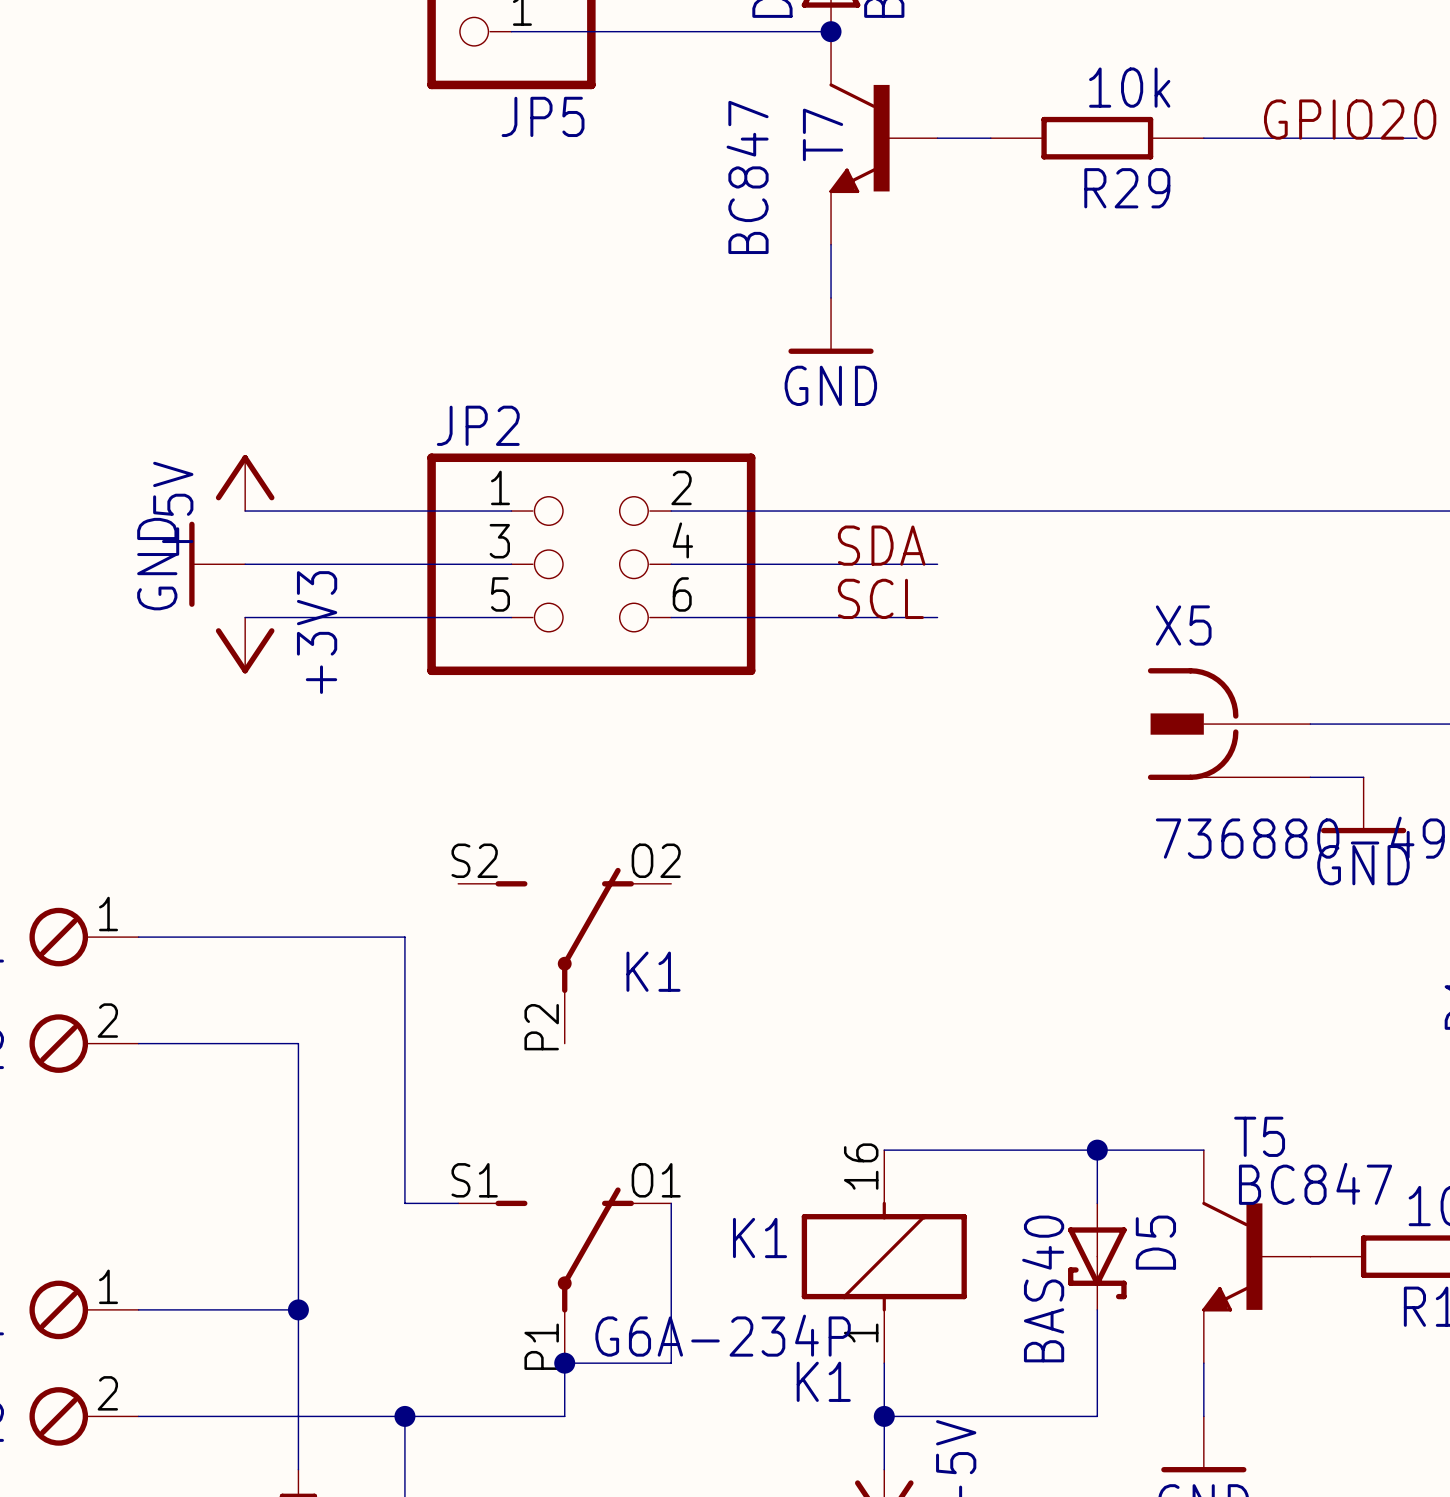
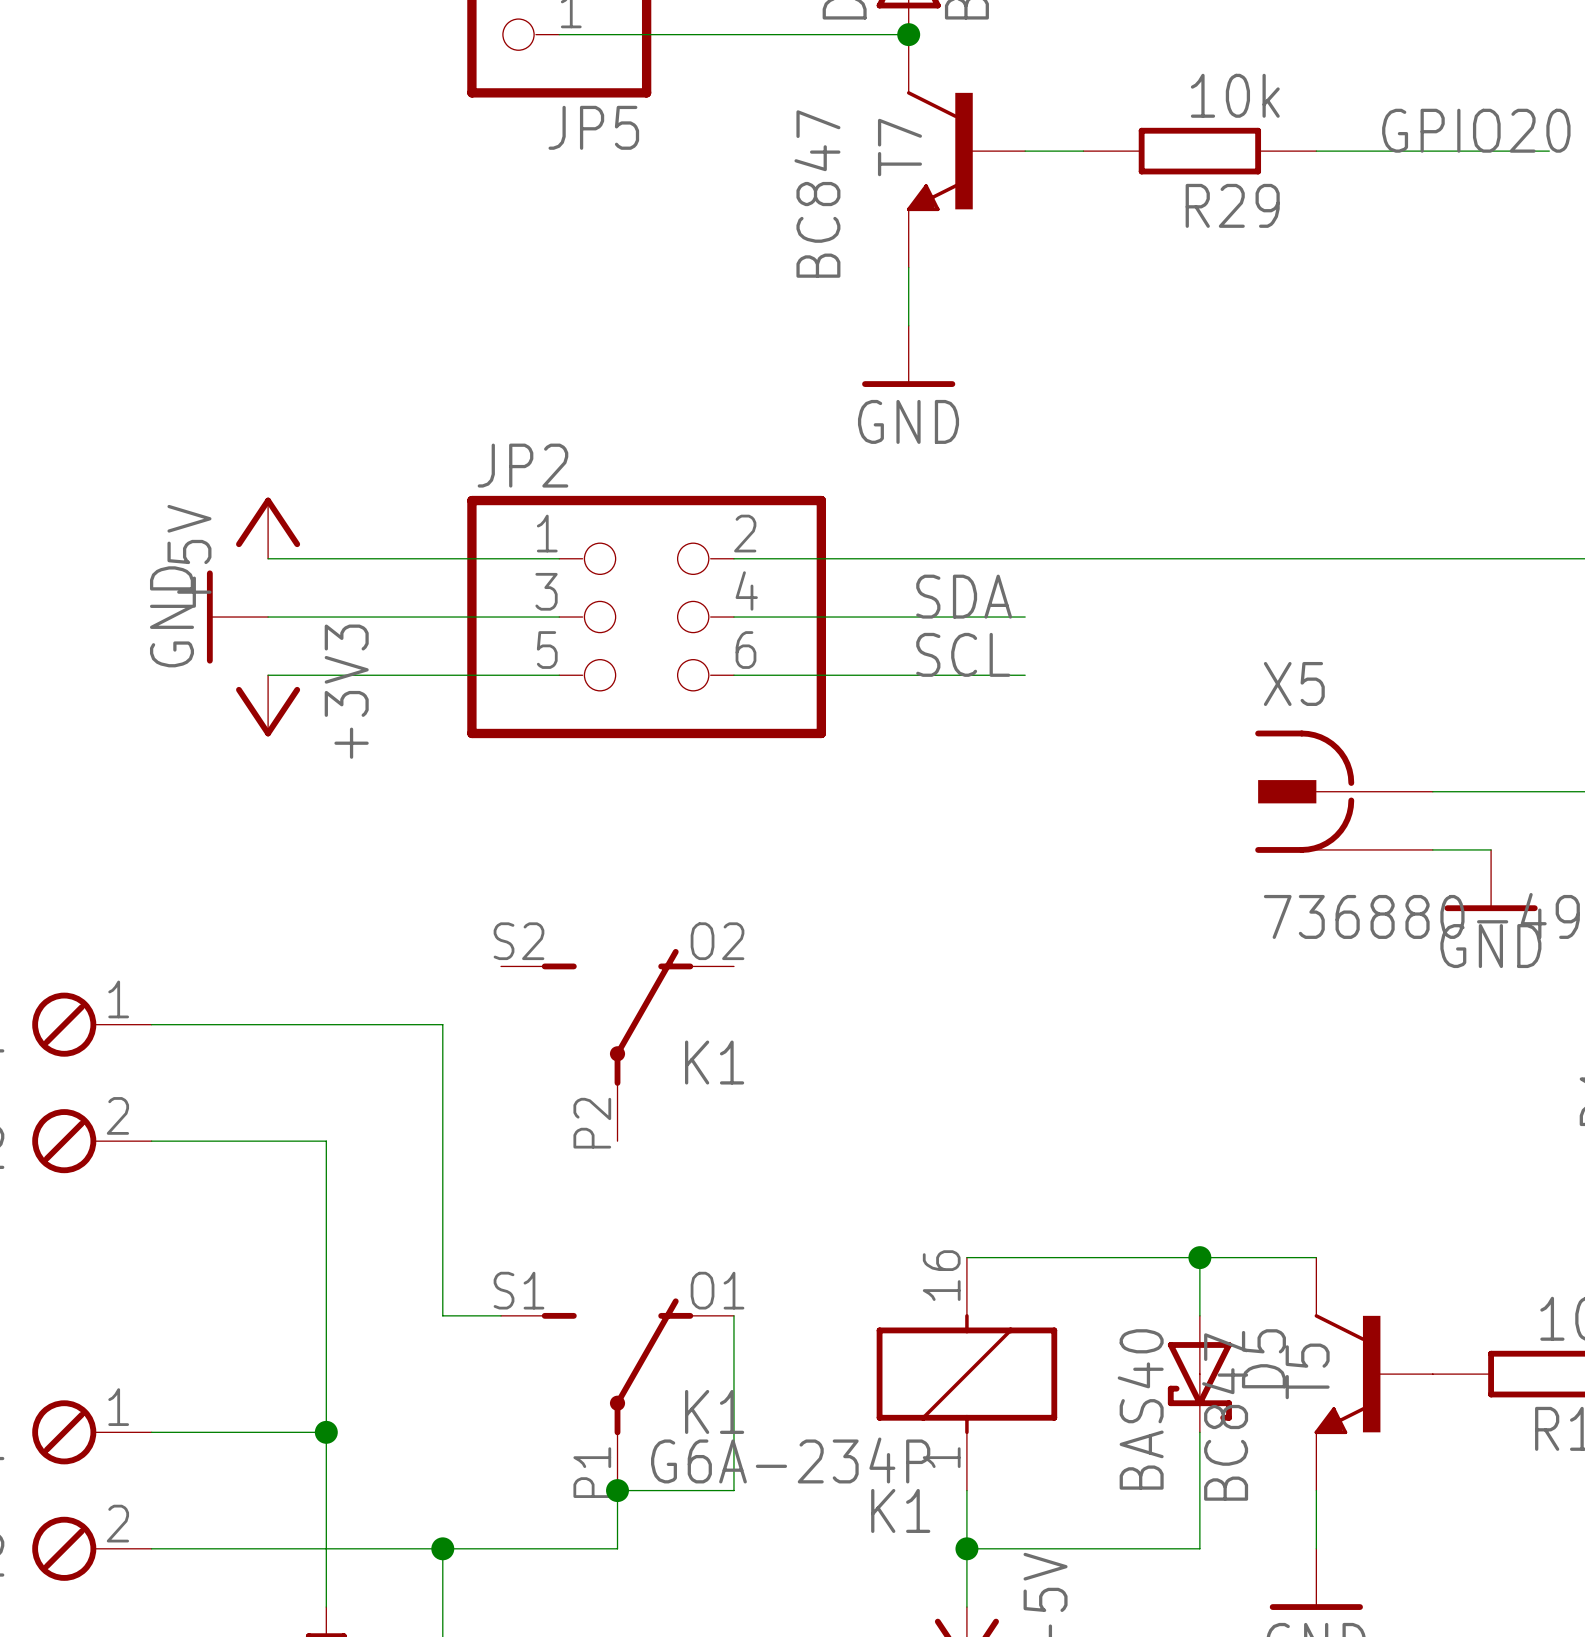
T5 name rotation: 0° (1259, 1136) -> 90° counterclockwise (1307, 1371)
T5 name position: T5 (1259, 1136) -> T5 (1307, 1371)
T5 value rotation: 0° (1315, 1183) -> 90° counterclockwise (1225, 1417)
T5 value position: BC847 (1315, 1183) -> BC847 (1225, 1417)
K1 name position: K1 (760, 1238) -> K1 (714, 1411)

